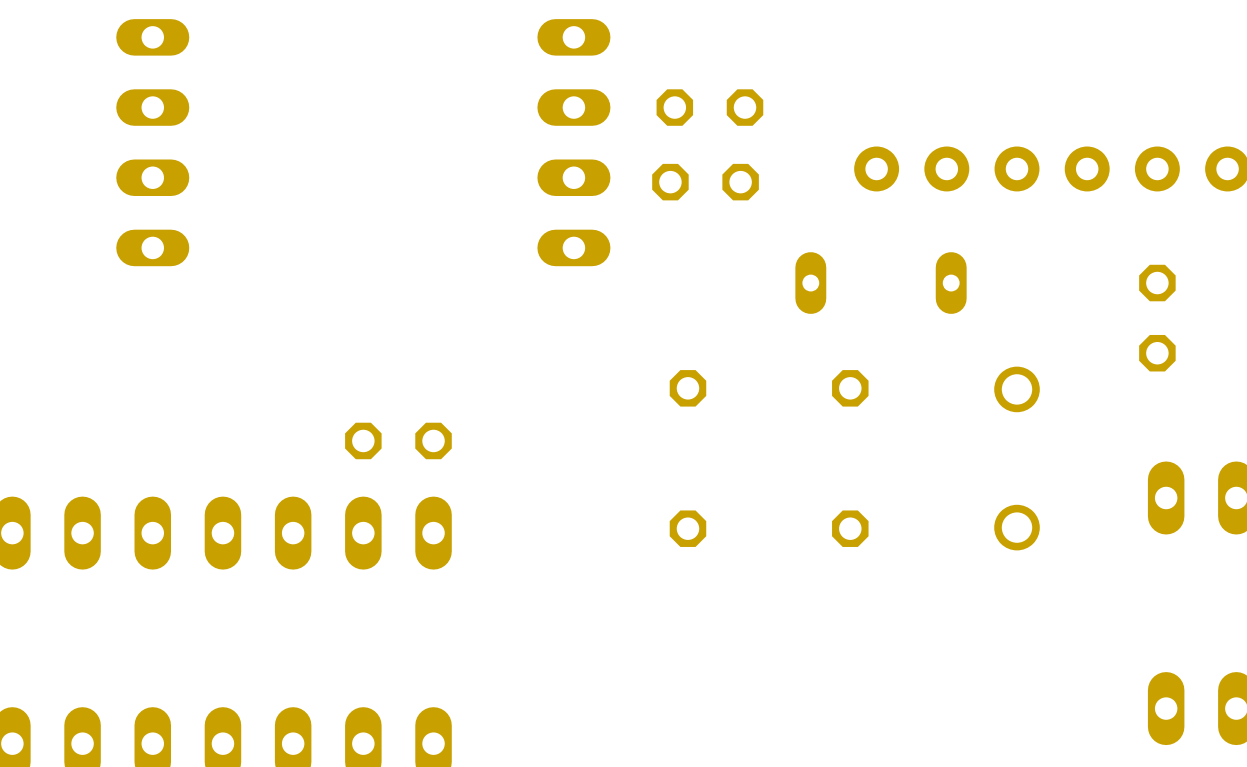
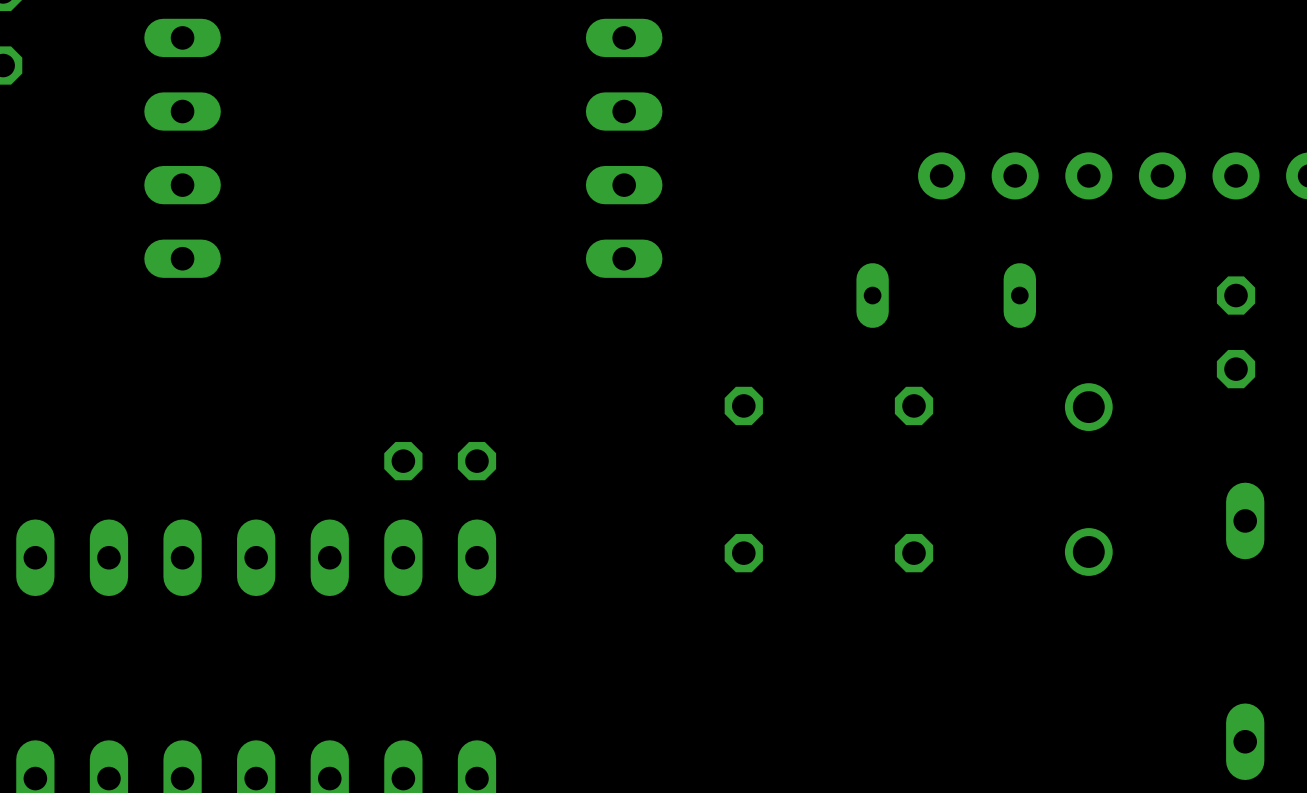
part: (709, 107) -> none
part: (705, 182) -> none

